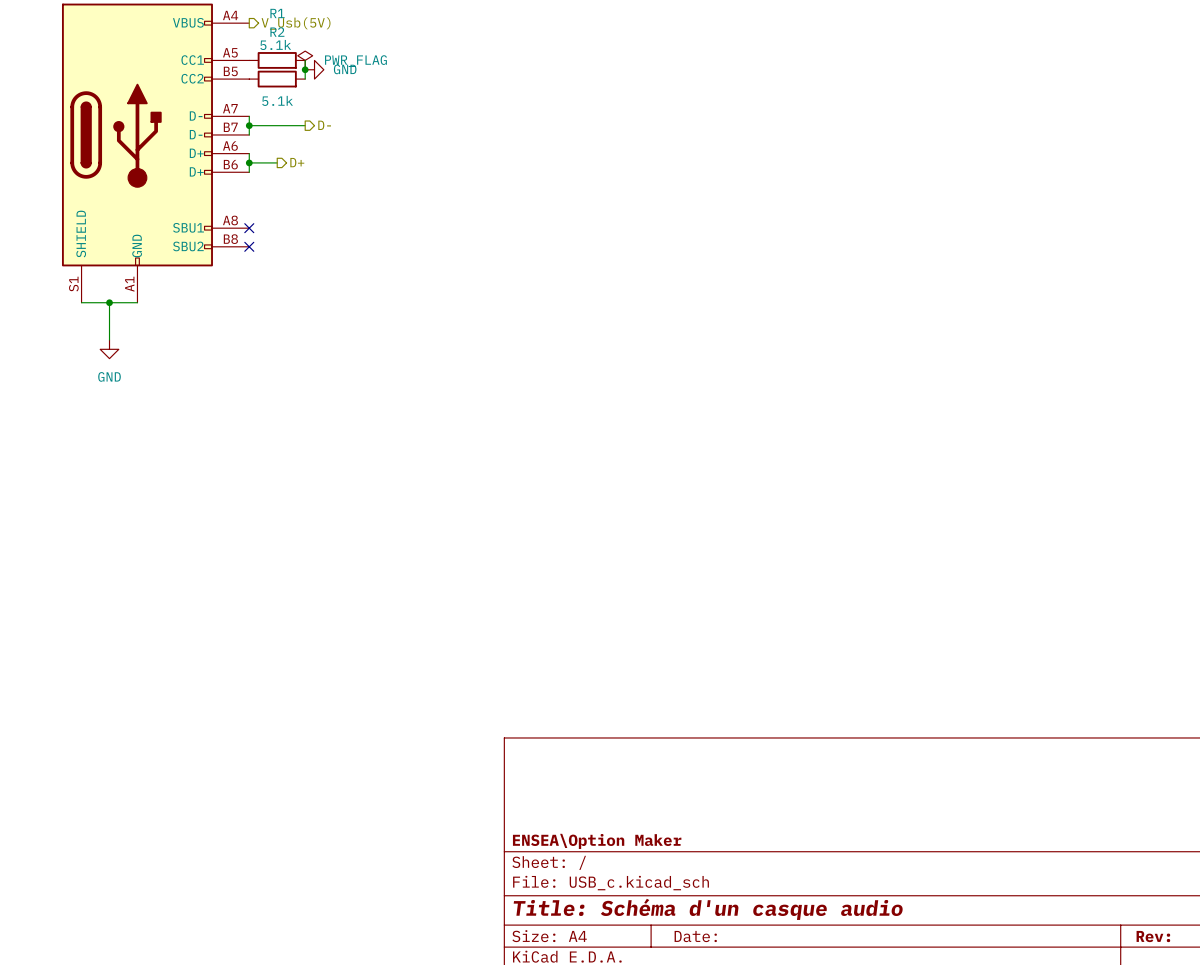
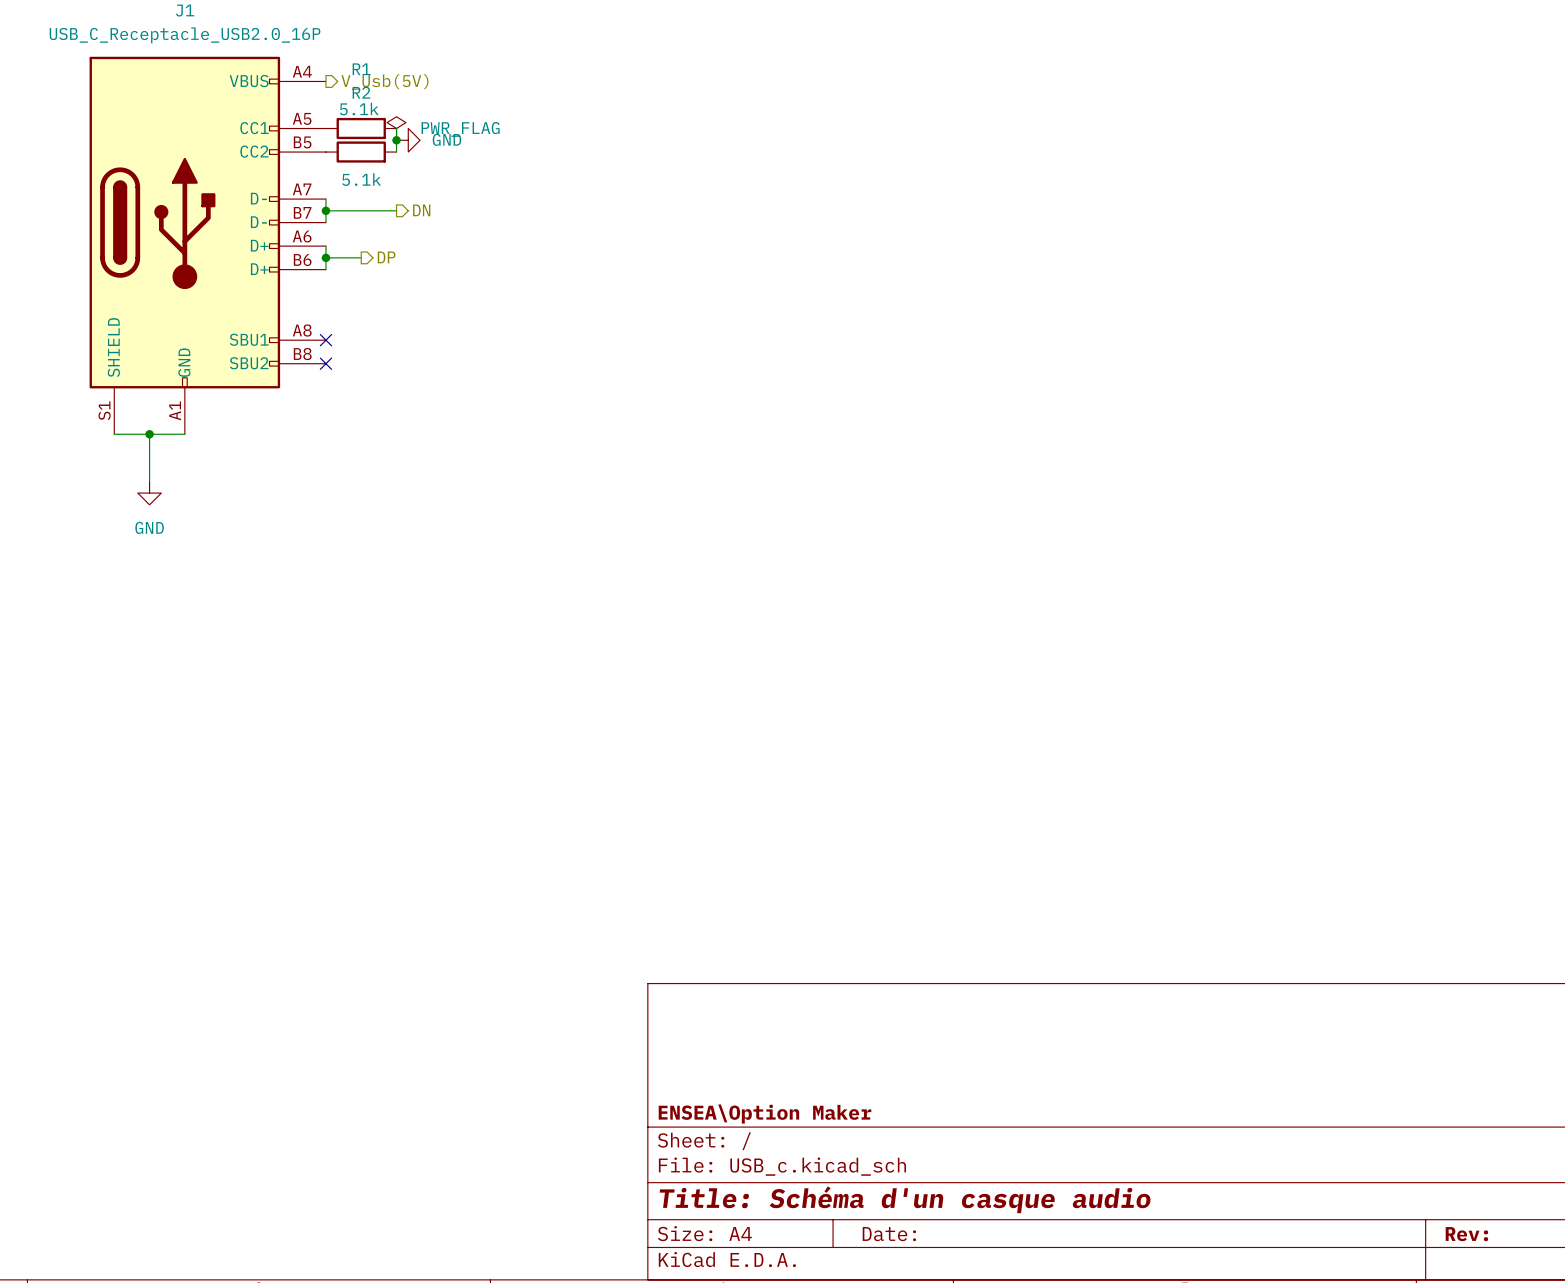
hierarchical label: D- (324, 125) -> DN (421, 210)
hierarchical label: D+ (297, 162) -> DP (386, 257)

